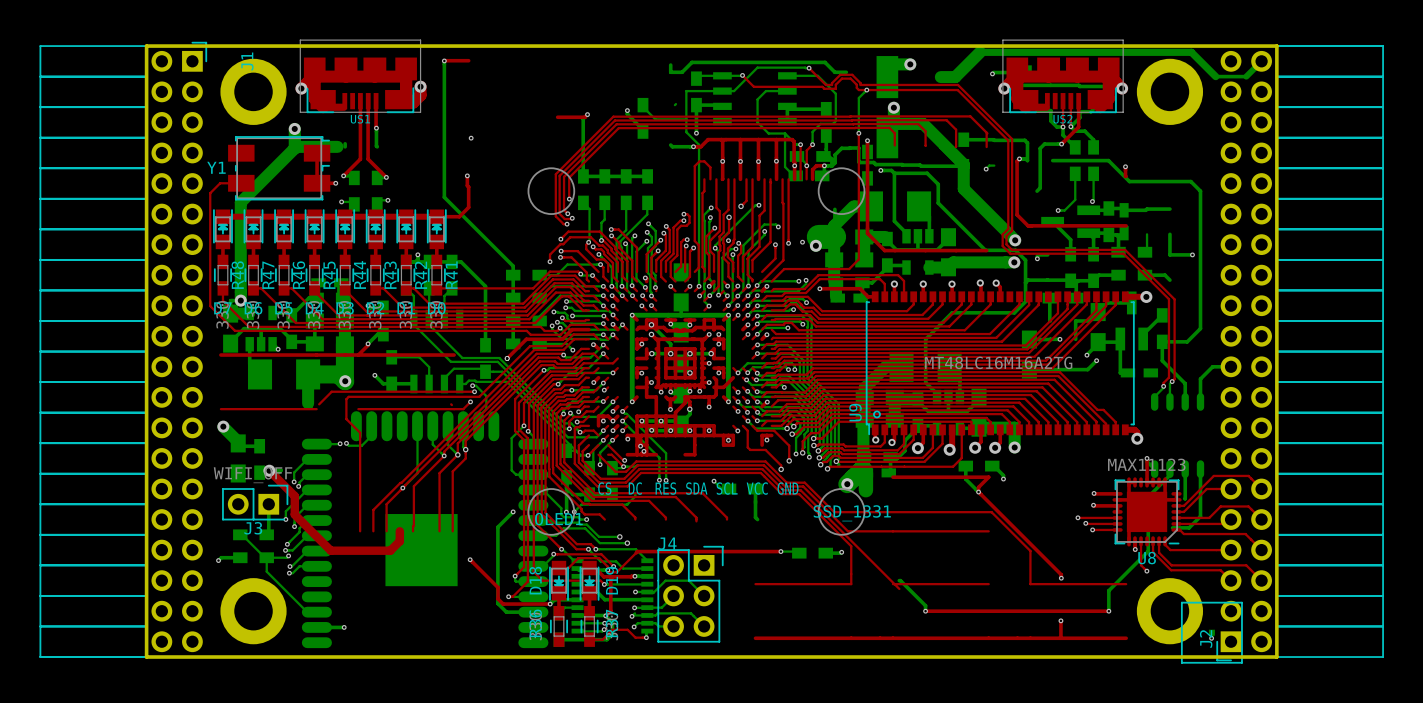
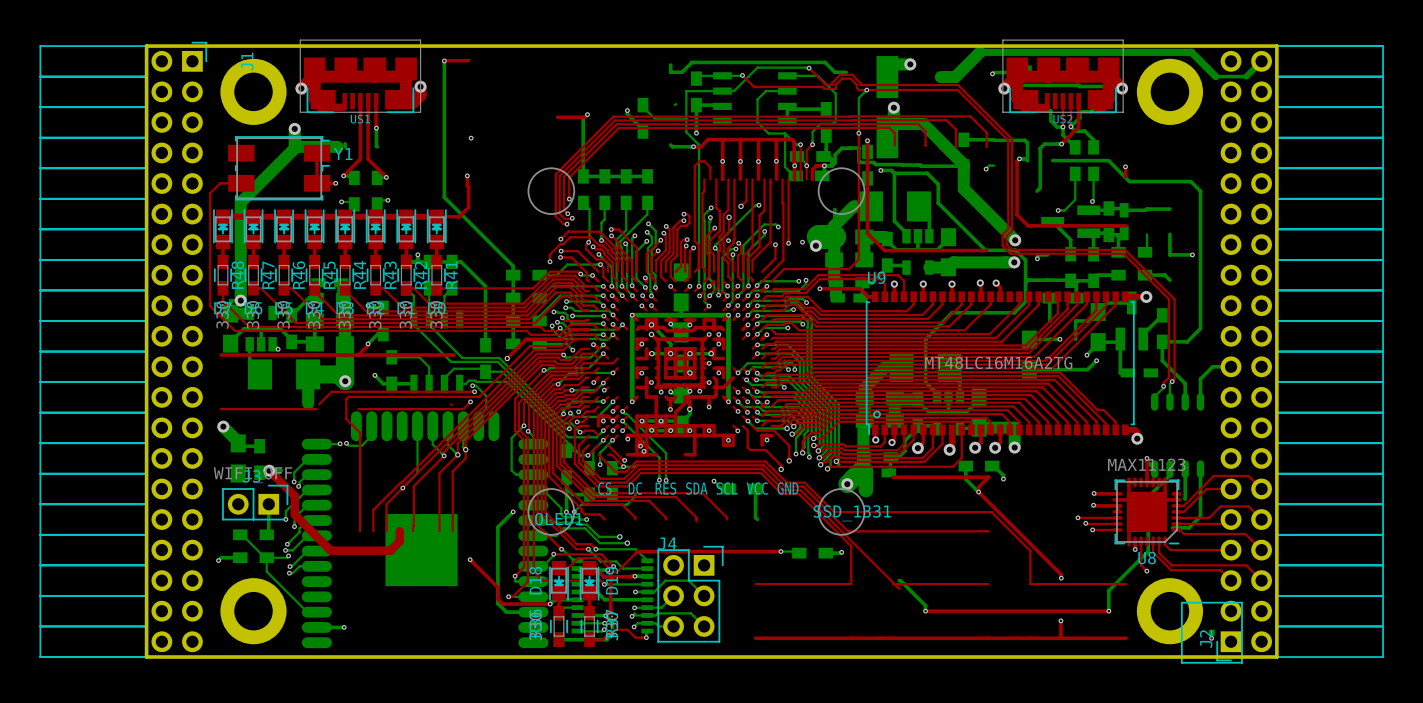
Y1 name position: Y1 (216, 167) -> Y1 (343, 154)
U9 name rotation: 0° (855, 412) -> 90° clockwise (876, 277)
U9 name position: U9 (855, 412) -> U9 (876, 277)
J3 name position: J3 (253, 528) -> J3 (251, 476)

